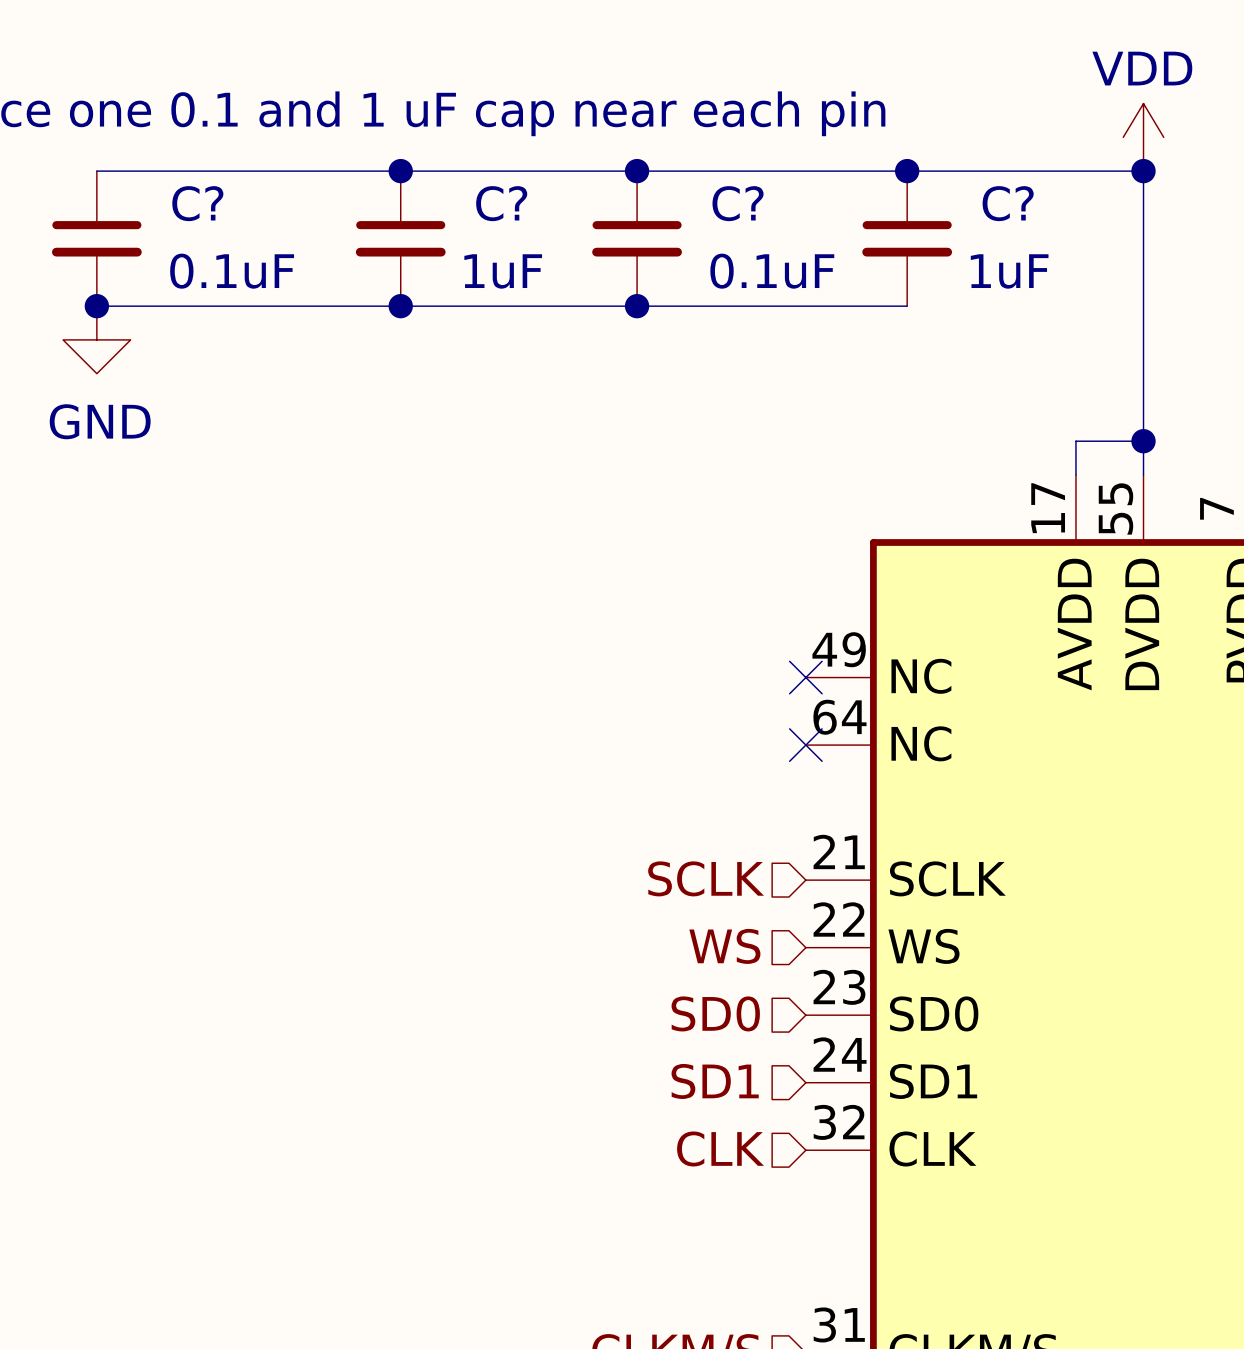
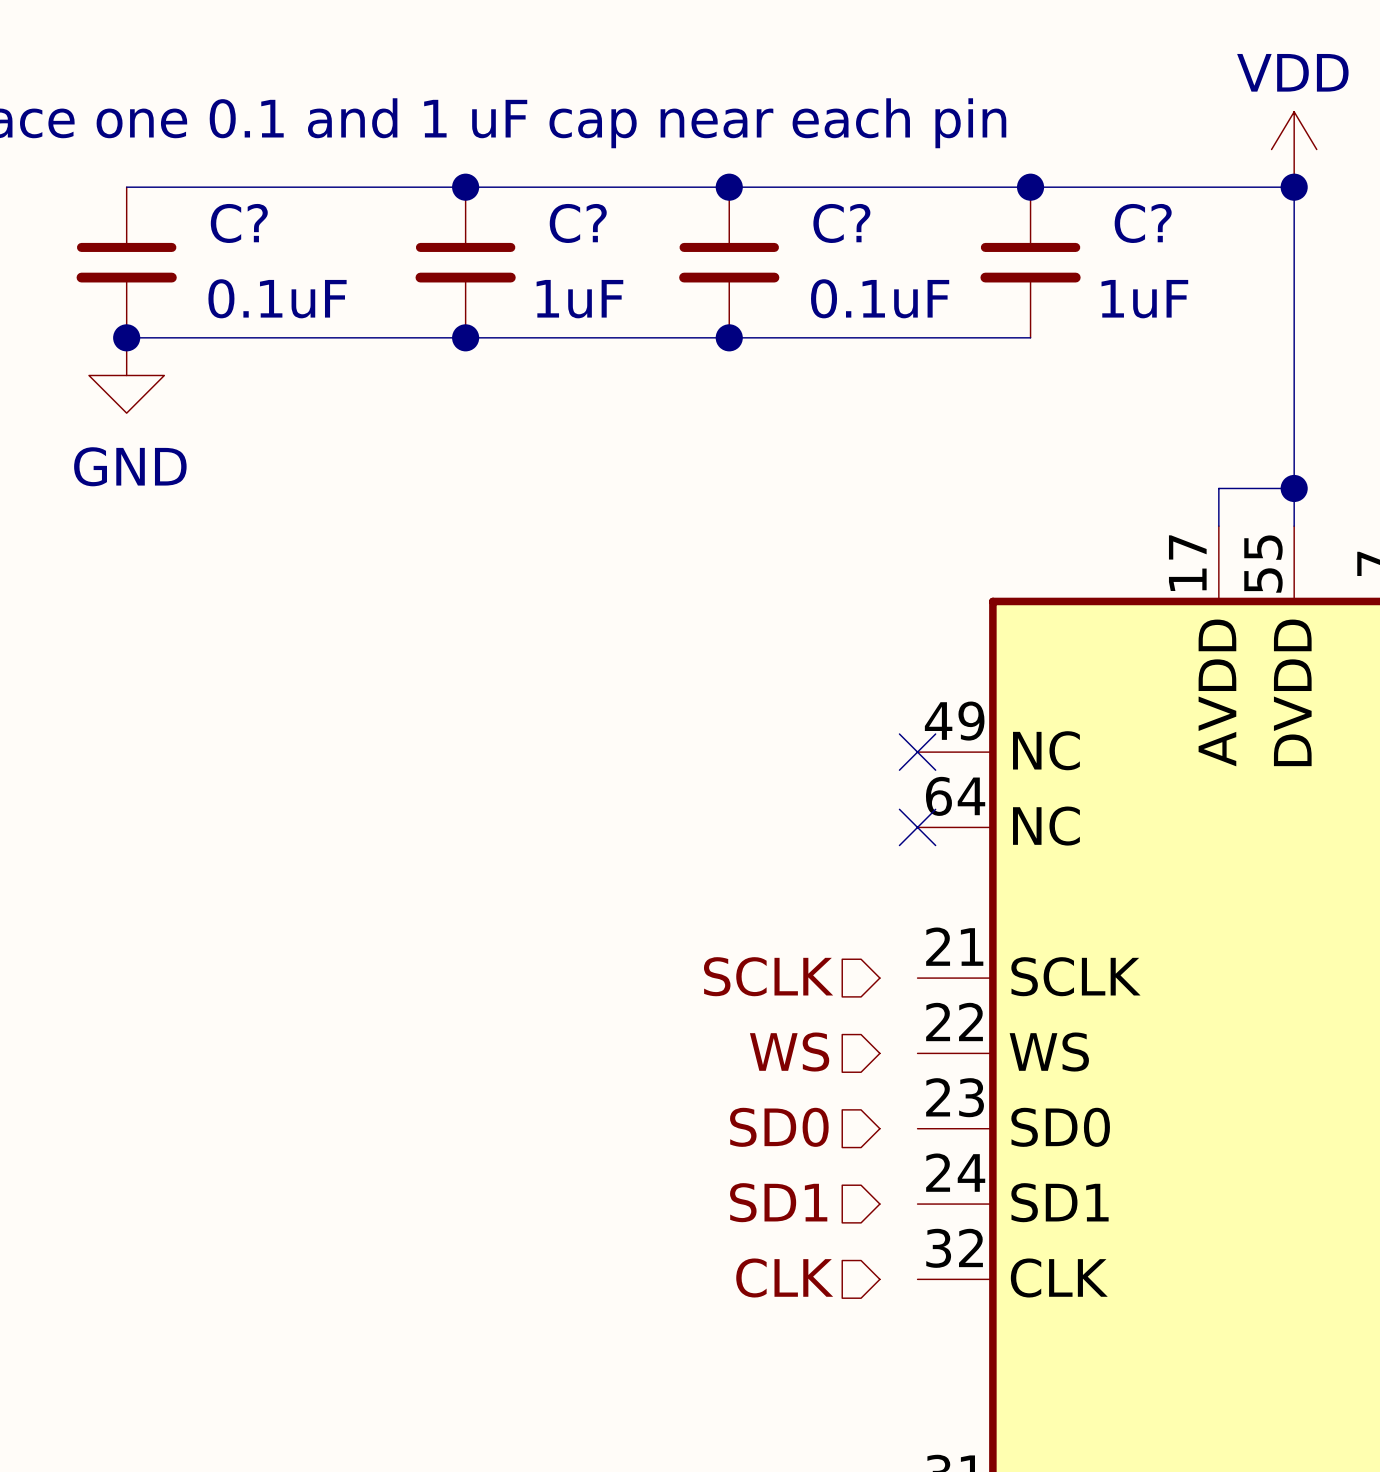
hierarchical label position: SCLK (706, 878) -> SCLK (768, 976)
hierarchical label position: WS (724, 946) -> WS (789, 1052)
hierarchical label position: SD0 (715, 1013) -> SD0 (779, 1127)
hierarchical label position: SD1 (715, 1081) -> SD1 (778, 1202)
hierarchical label position: CLK (720, 1148) -> CLK (784, 1277)

